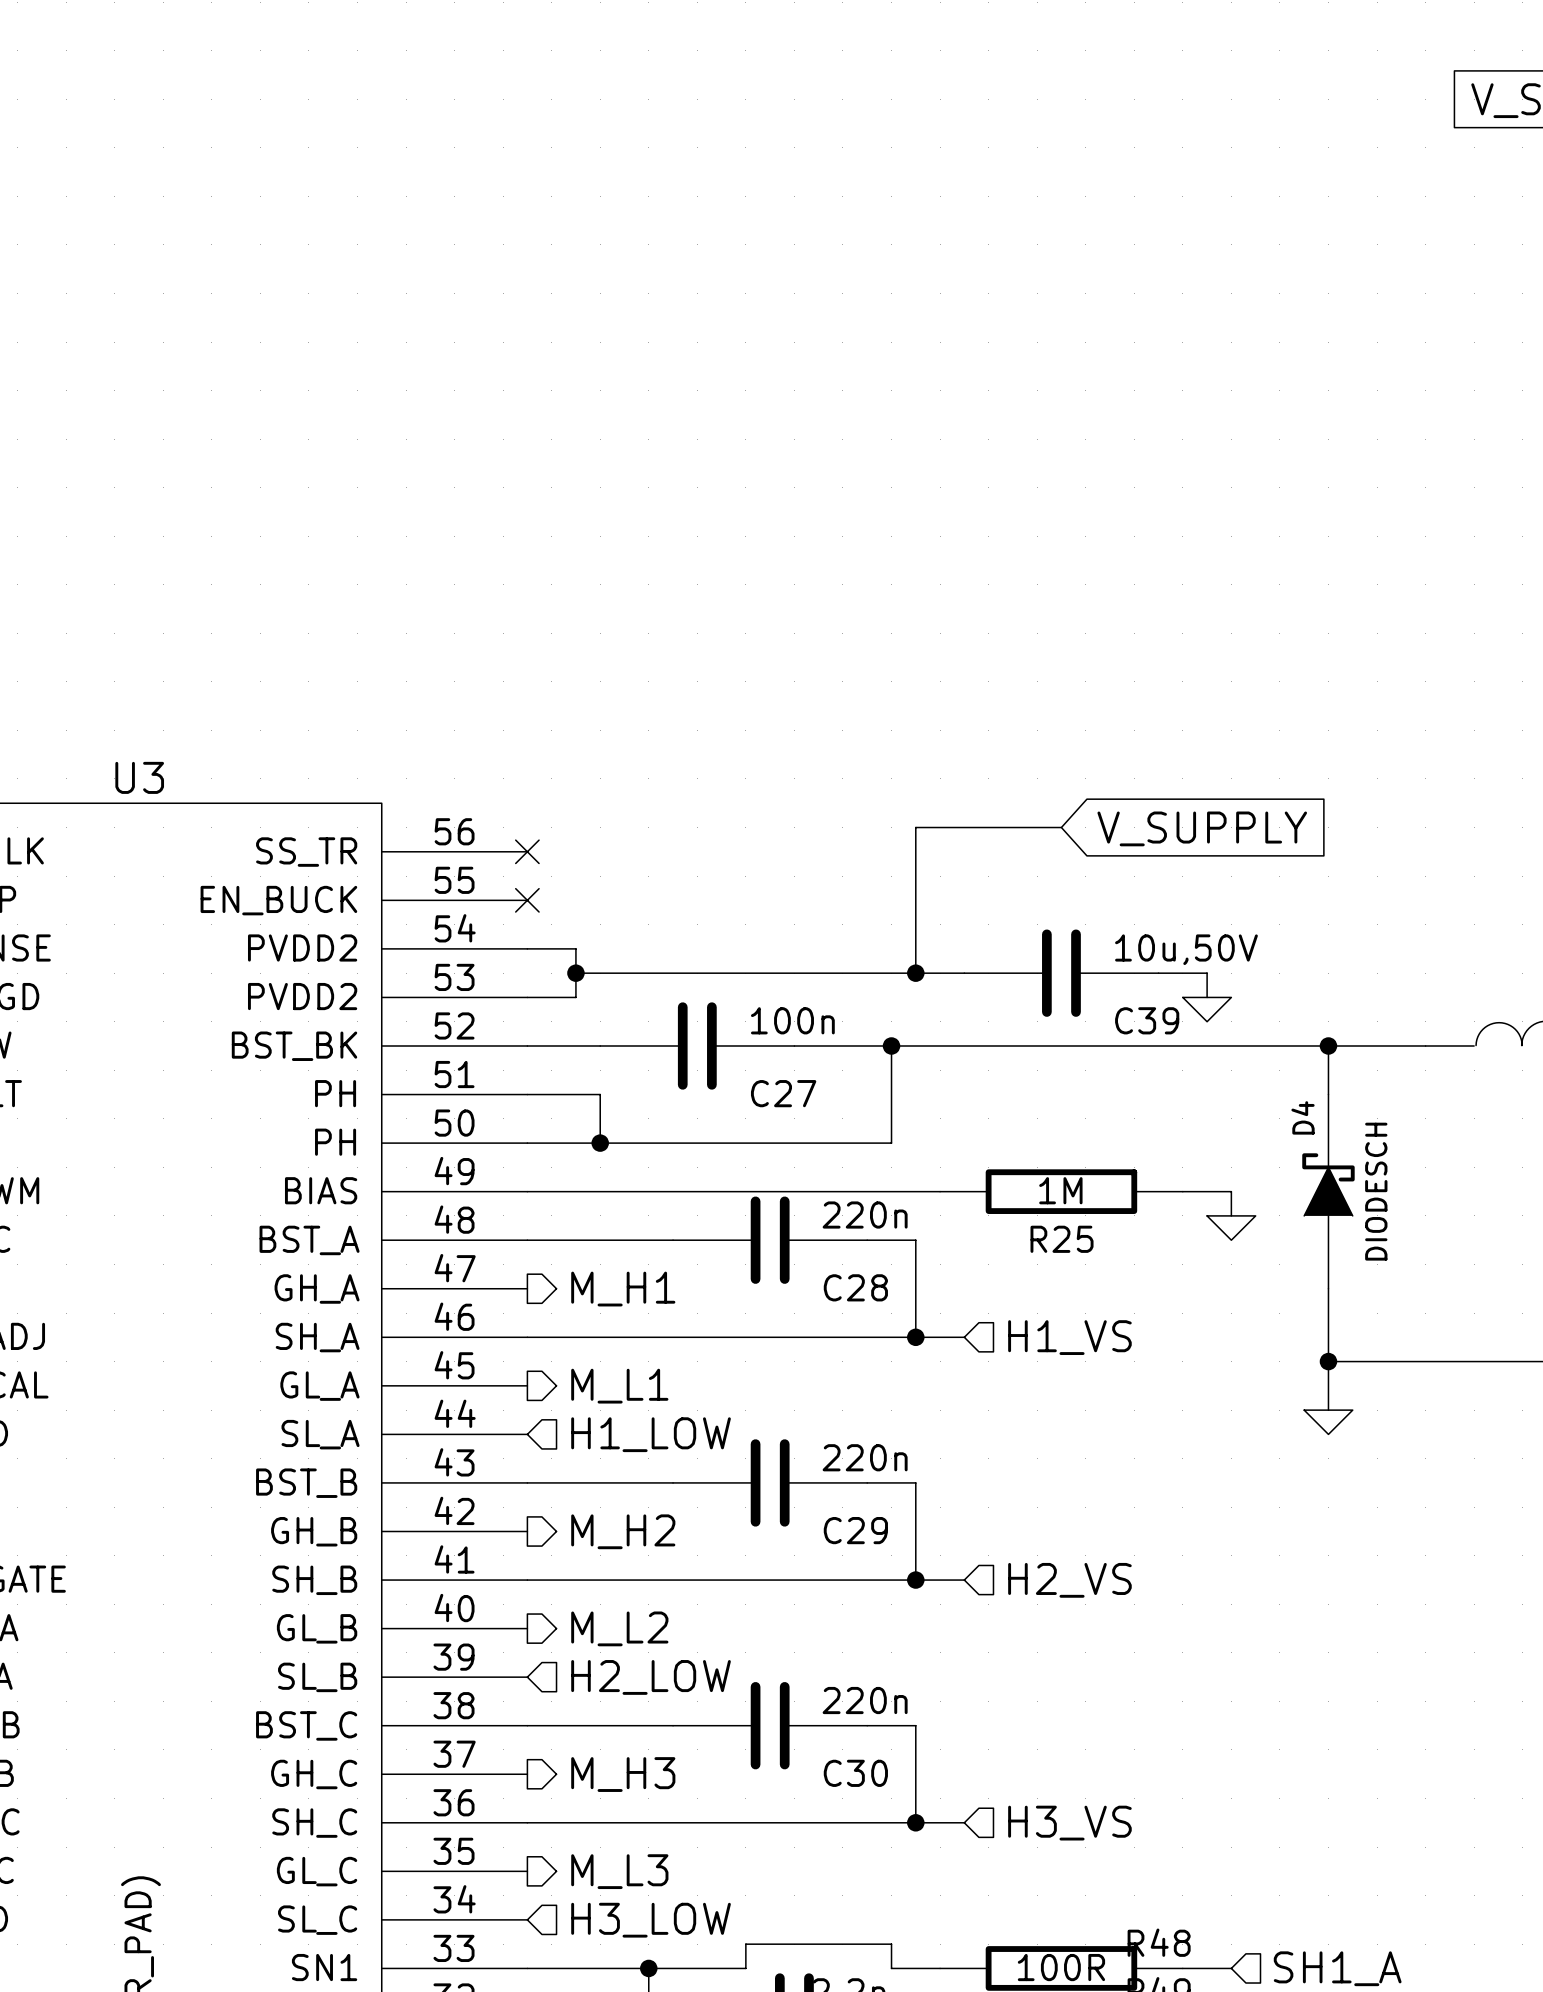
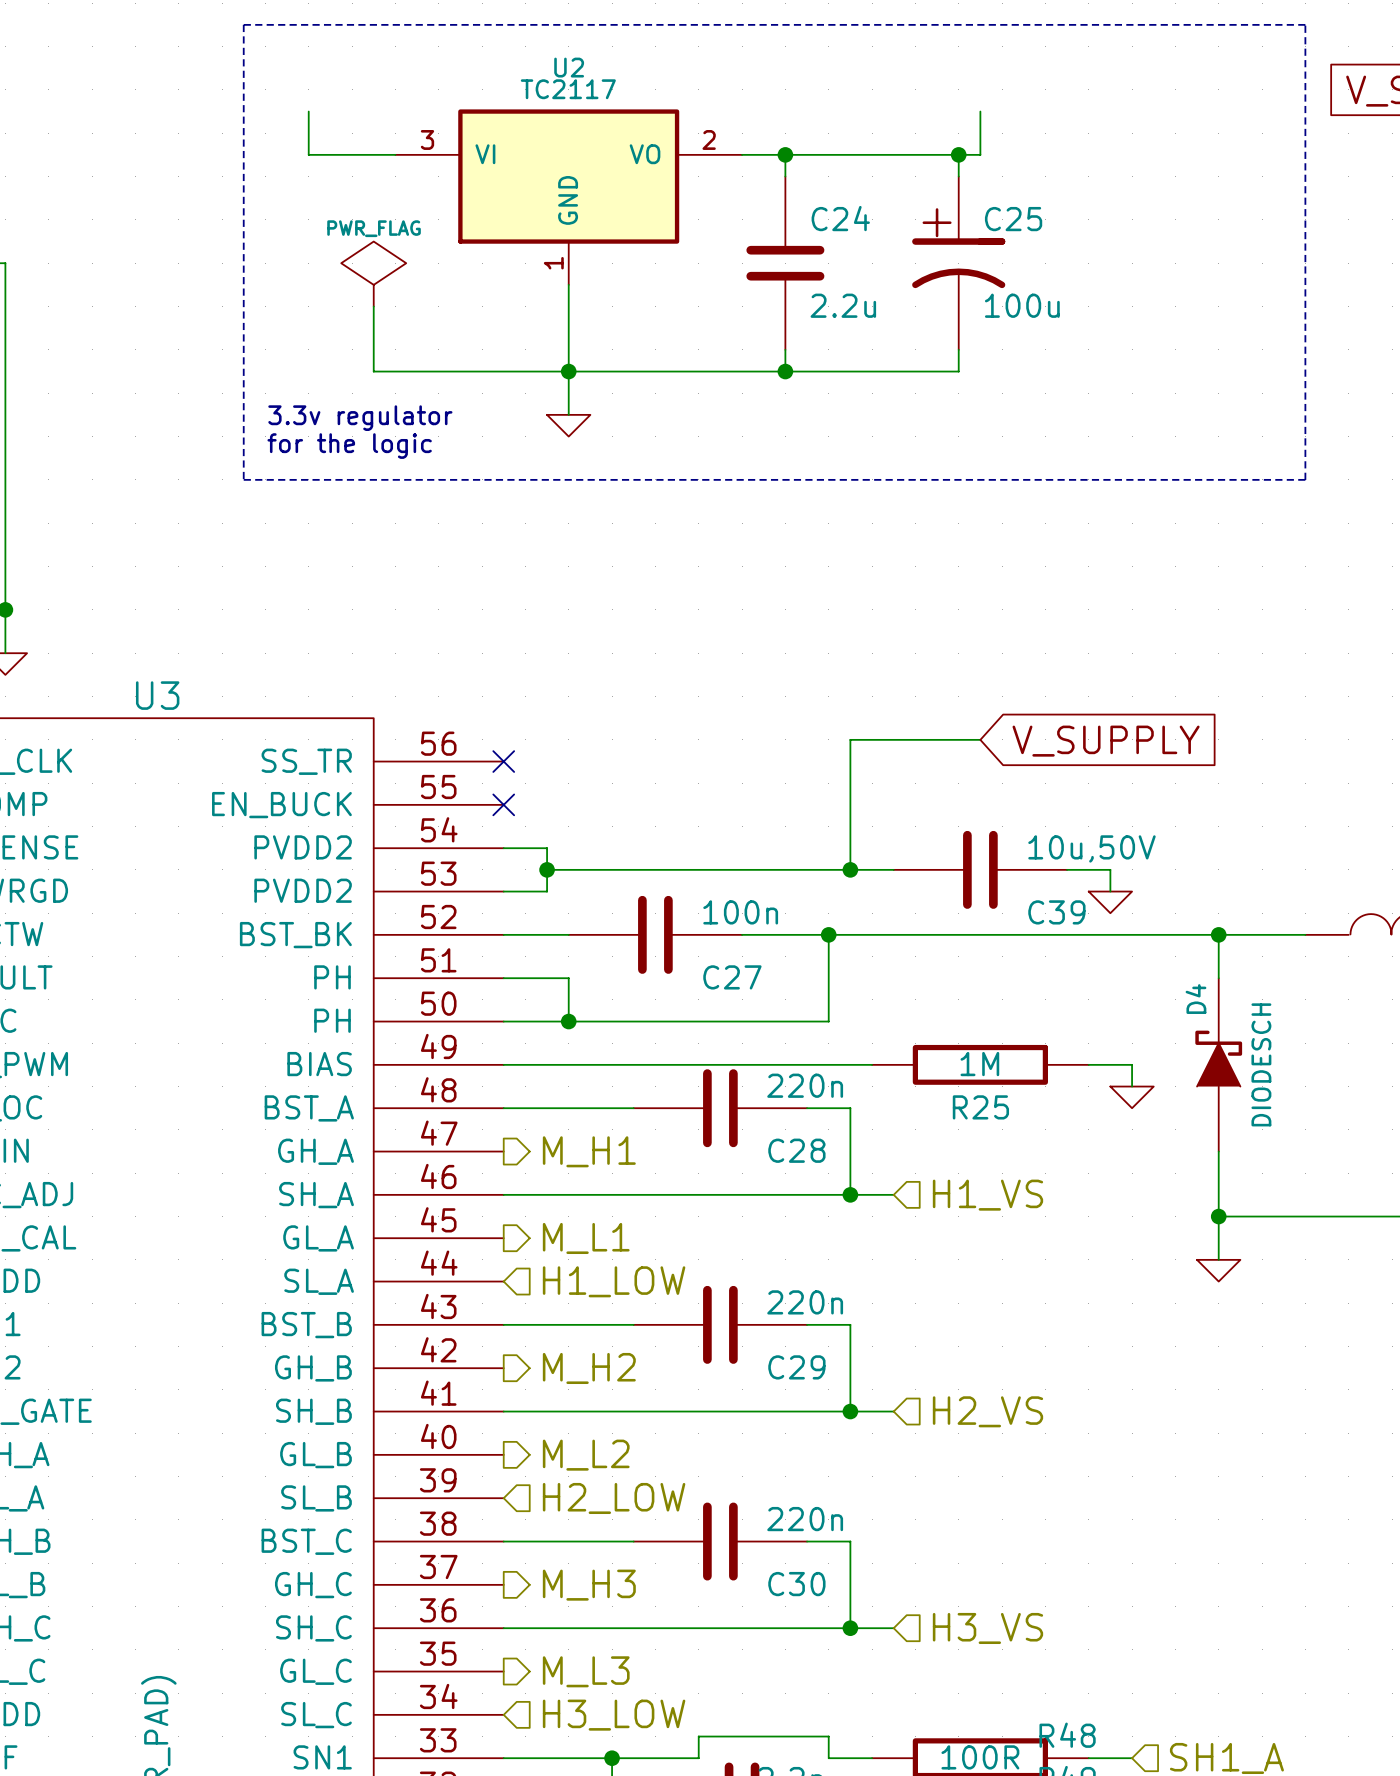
line: none -> (243, 24) (1305, 24) (1305, 479) (243, 479) (243, 24)
wire: none -> (308, 111) (308, 154) (395, 154)
wire: none -> (980, 111) (980, 154) (742, 154)
wire: none -> (785, 154) (785, 176)
junction: none -> (785, 154)
wire: none -> (958, 154) (958, 176)
junction: none -> (958, 154)
U2: none -> TC2117 (568, 197)
C24: none -> 2.2u (785, 263)
C25: none -> 100u (958, 263)
power symbol: none -> PWR_FLAG (373, 274)
wire: none -> (568, 284) (568, 414)
wire: none -> (373, 306) (373, 371) (958, 371) (958, 349)
wire: none -> (785, 349) (785, 371)
junction: none -> (568, 371)
junction: none -> (785, 371)
text: none -> 3.3v regulator (360, 418)
power symbol: none -> (568, 425)
text: none -> for the logic (349, 446)

